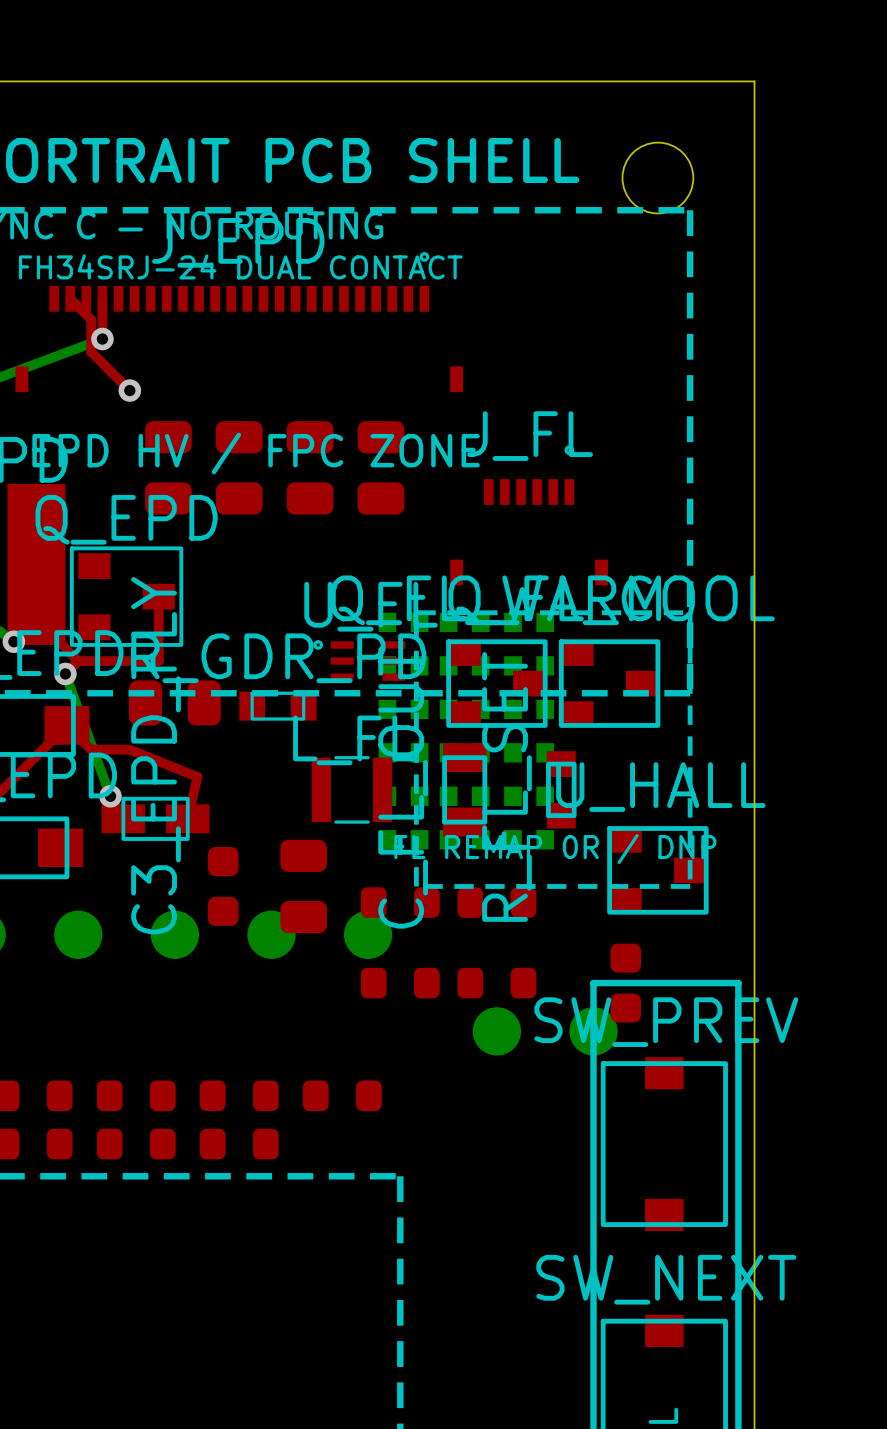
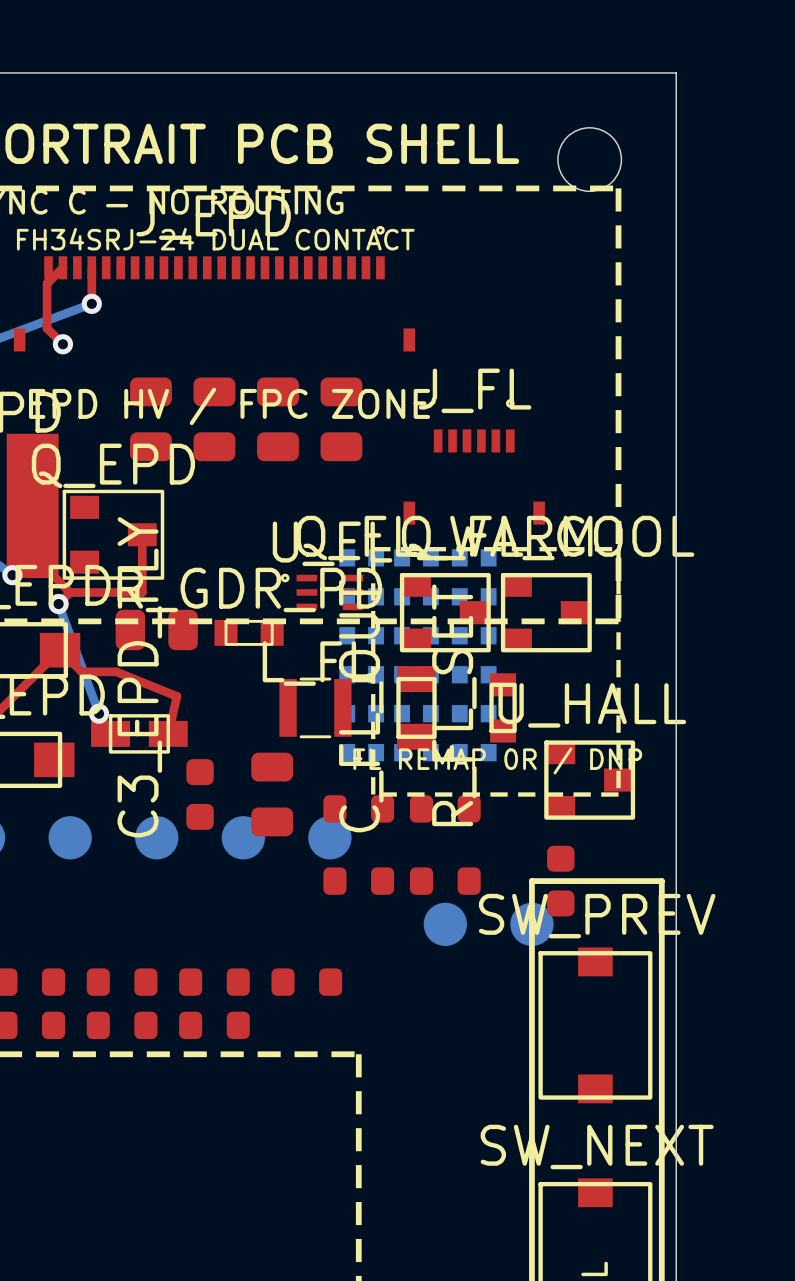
top track: (70, 298) (91, 319) (91, 351) (129, 390) -> (62, 267) (47, 283) (47, 328) (62, 344)
via position: (129, 390) -> (62, 344)

